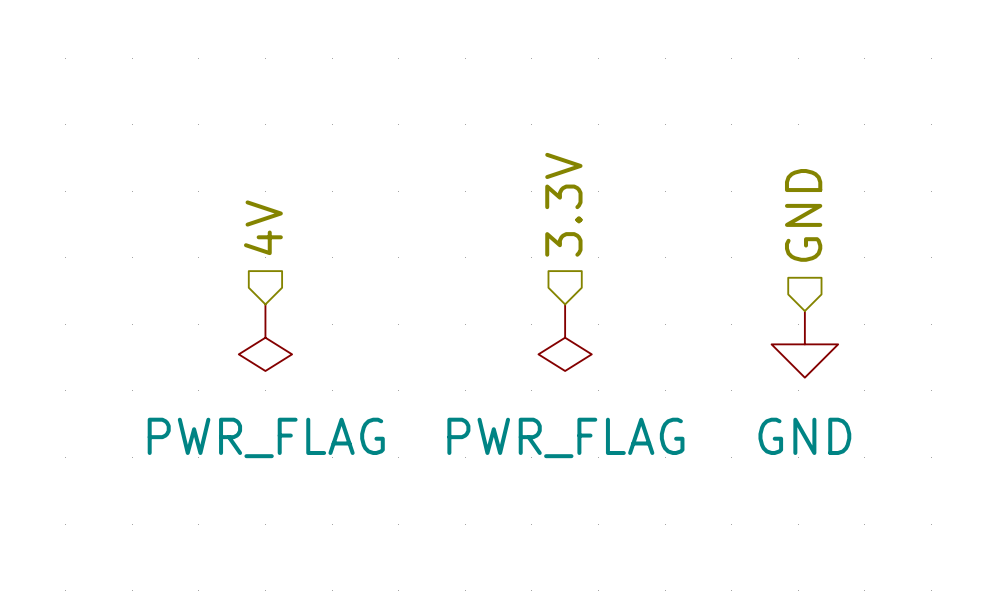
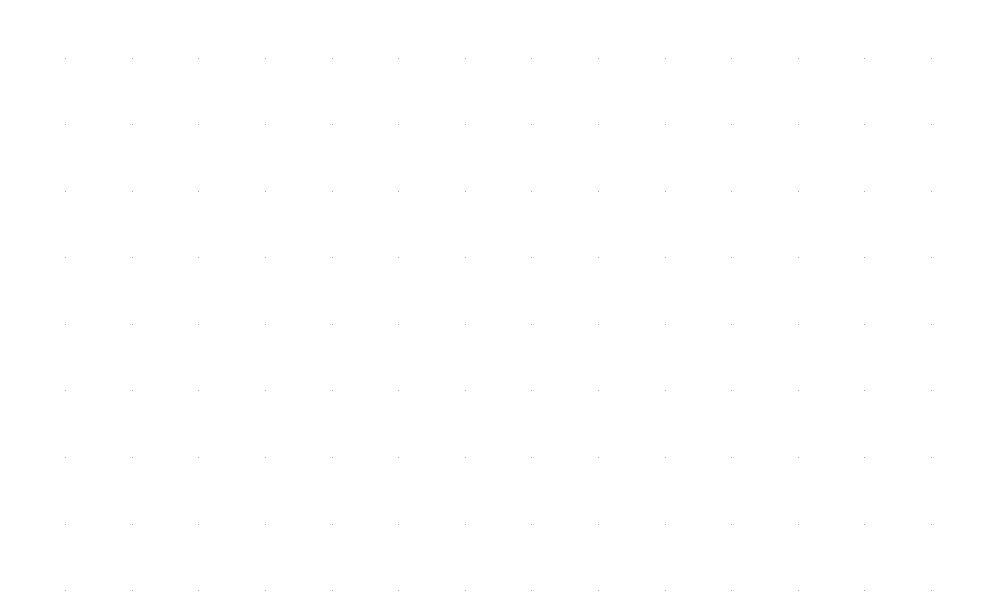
hierarchical label: 3.3V (563, 204) -> none
hierarchical label: GND (803, 215) -> none
hierarchical label: 4V (263, 227) -> none
power symbol: PWR_FLAG (265, 337) -> none
power symbol: PWR_FLAG (565, 337) -> none
power symbol: GND (804, 344) -> none

